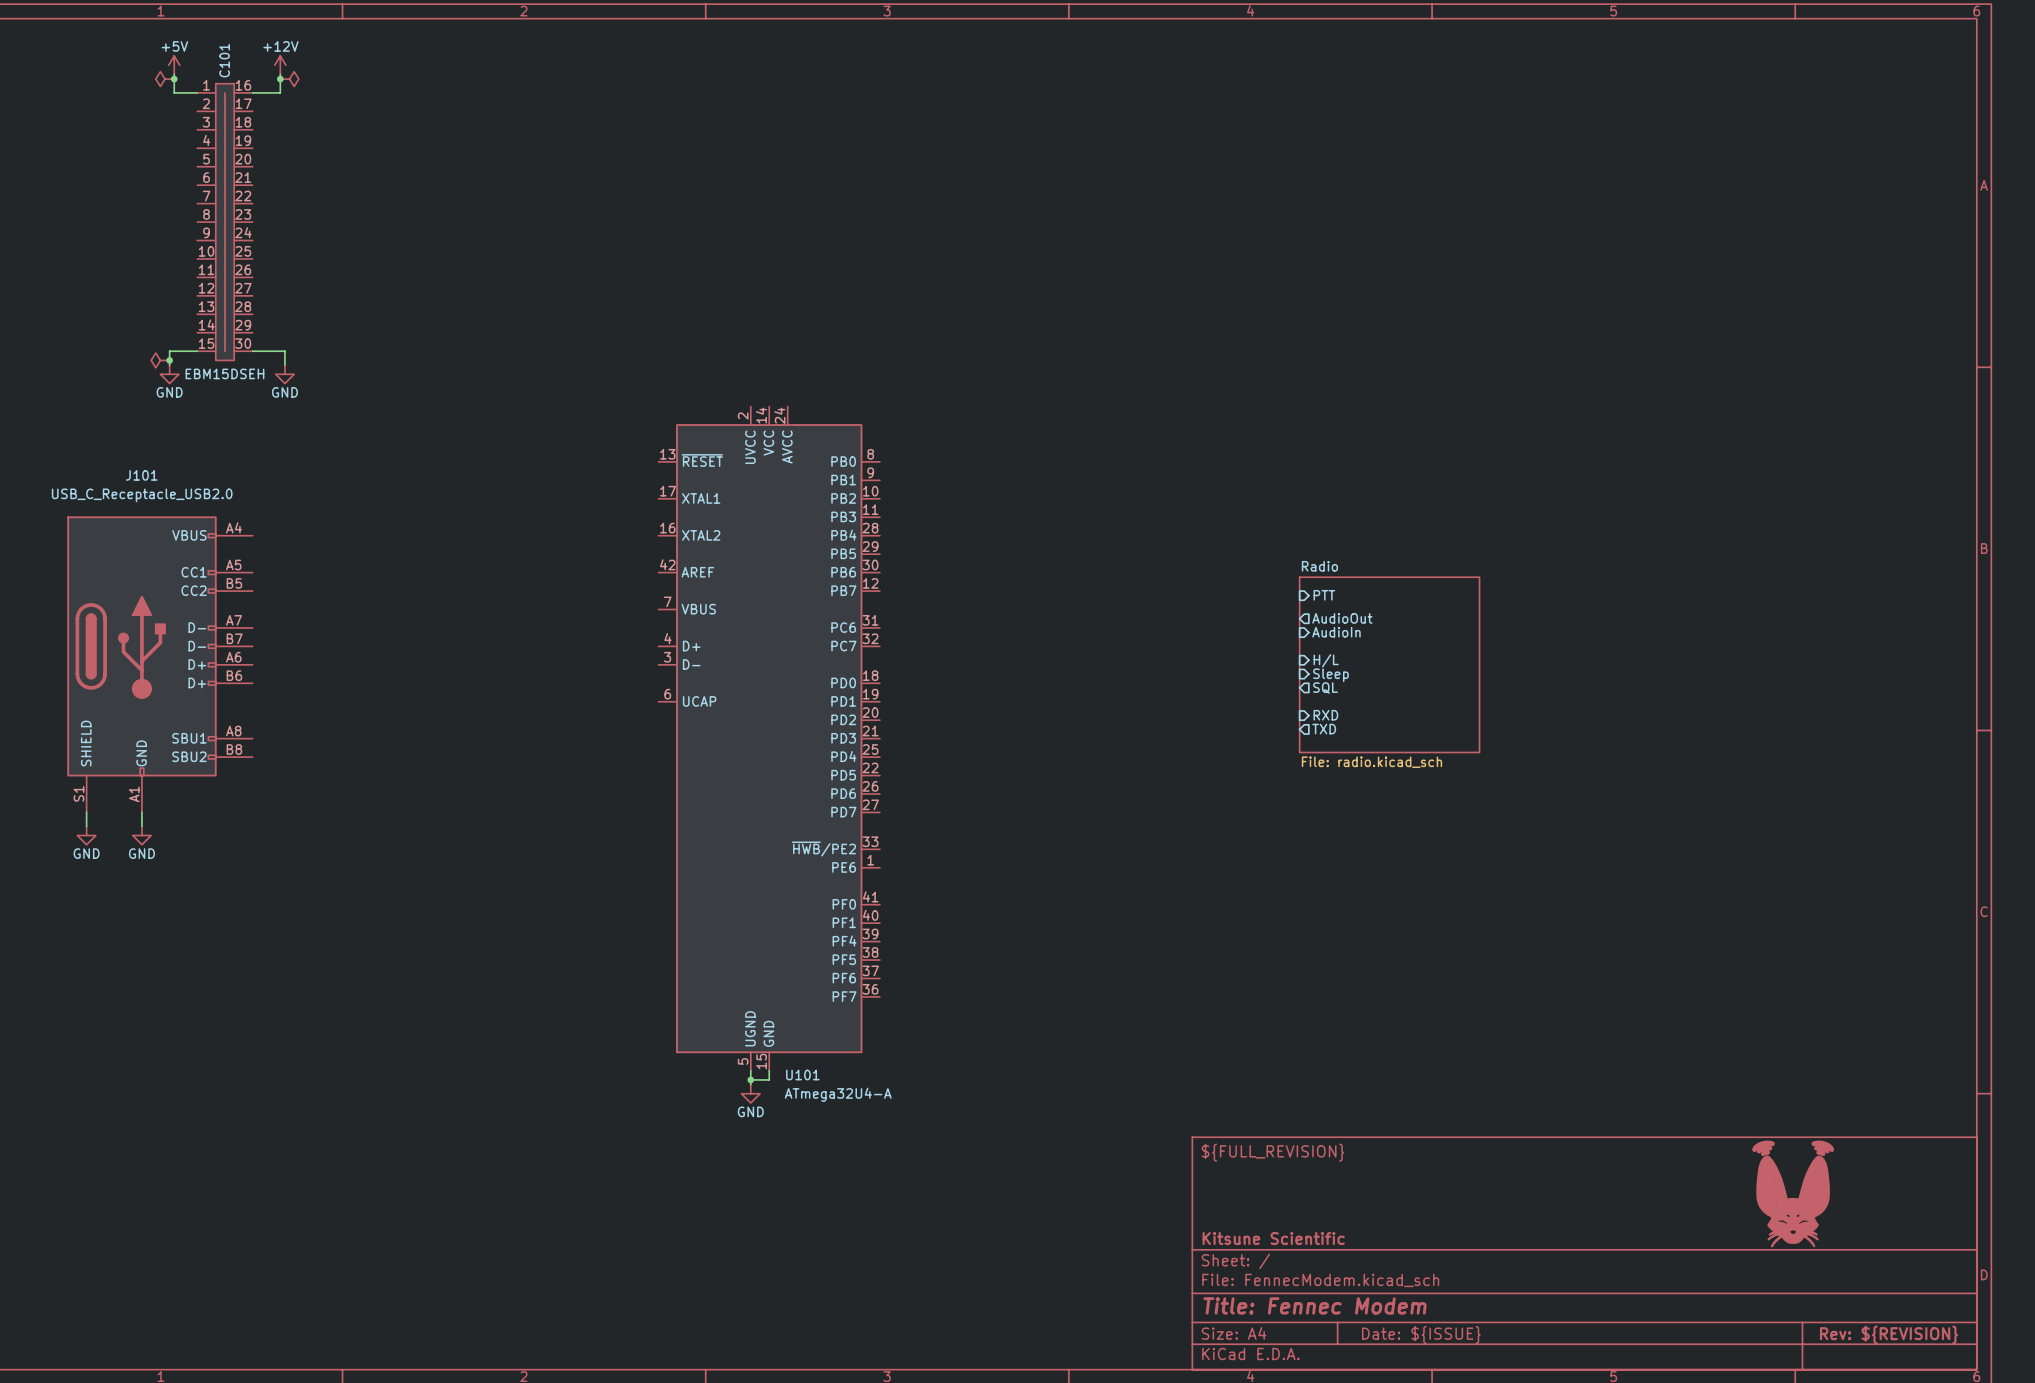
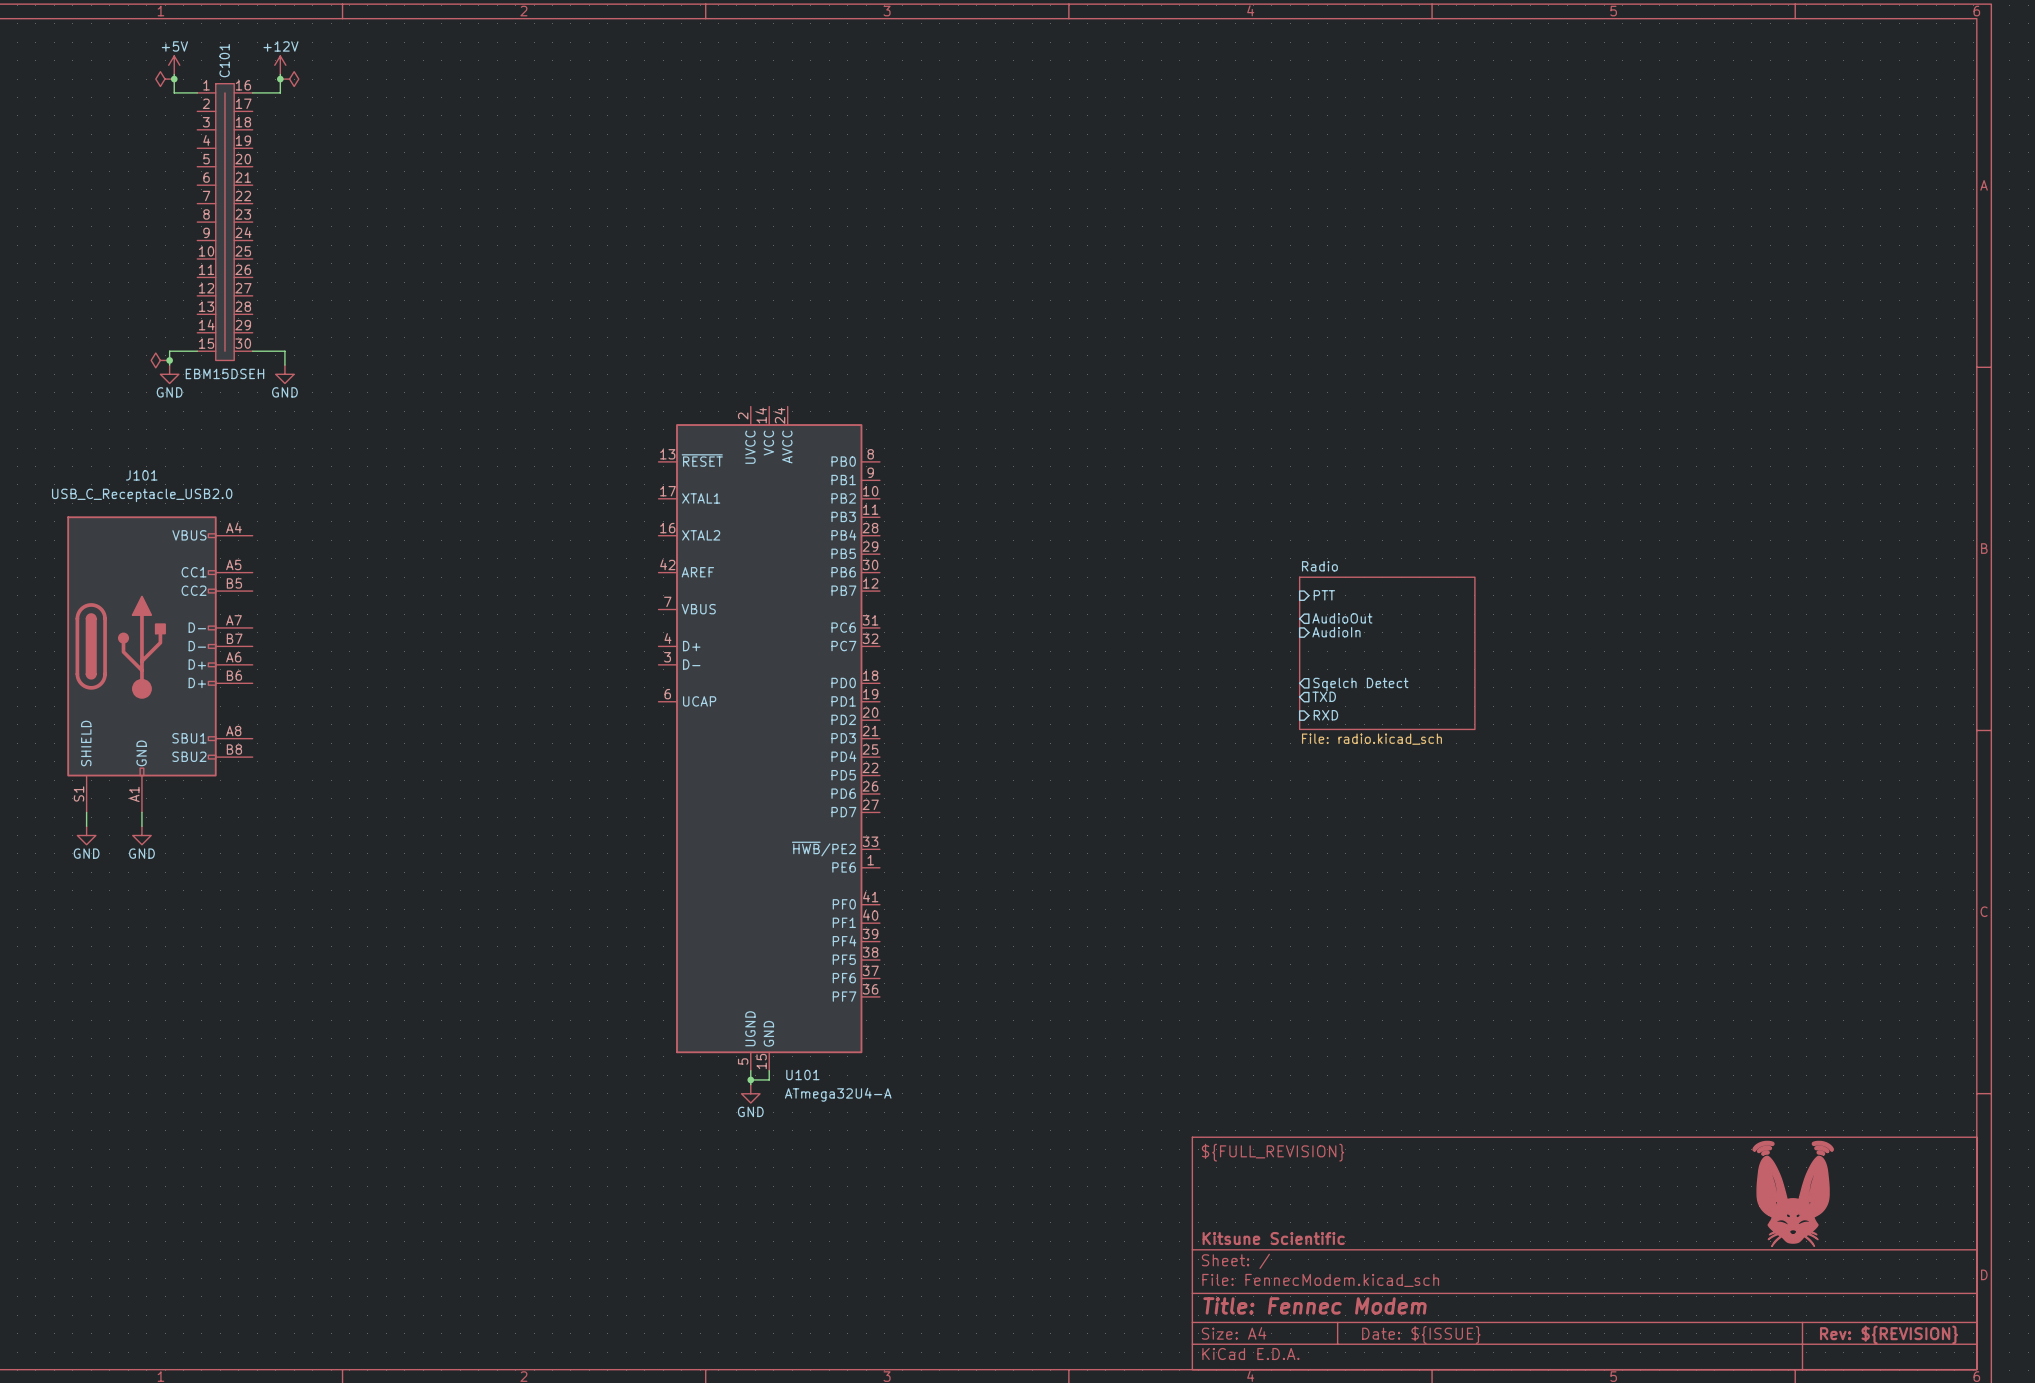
sheet Radio: none -> File: radio.kicad_sch (1387, 653)
sheet pin: H/L (1326, 660) -> none
sheet Radio: File: radio.kicad_sch (1389, 664) -> none
sheet pin: Sleep (1330, 675) -> none
sheet pin: none -> Sqelch Detect (1360, 684)
sheet pin: SQL (1325, 688) -> none
sheet pin position: TXD (1324, 729) -> TXD (1324, 696)

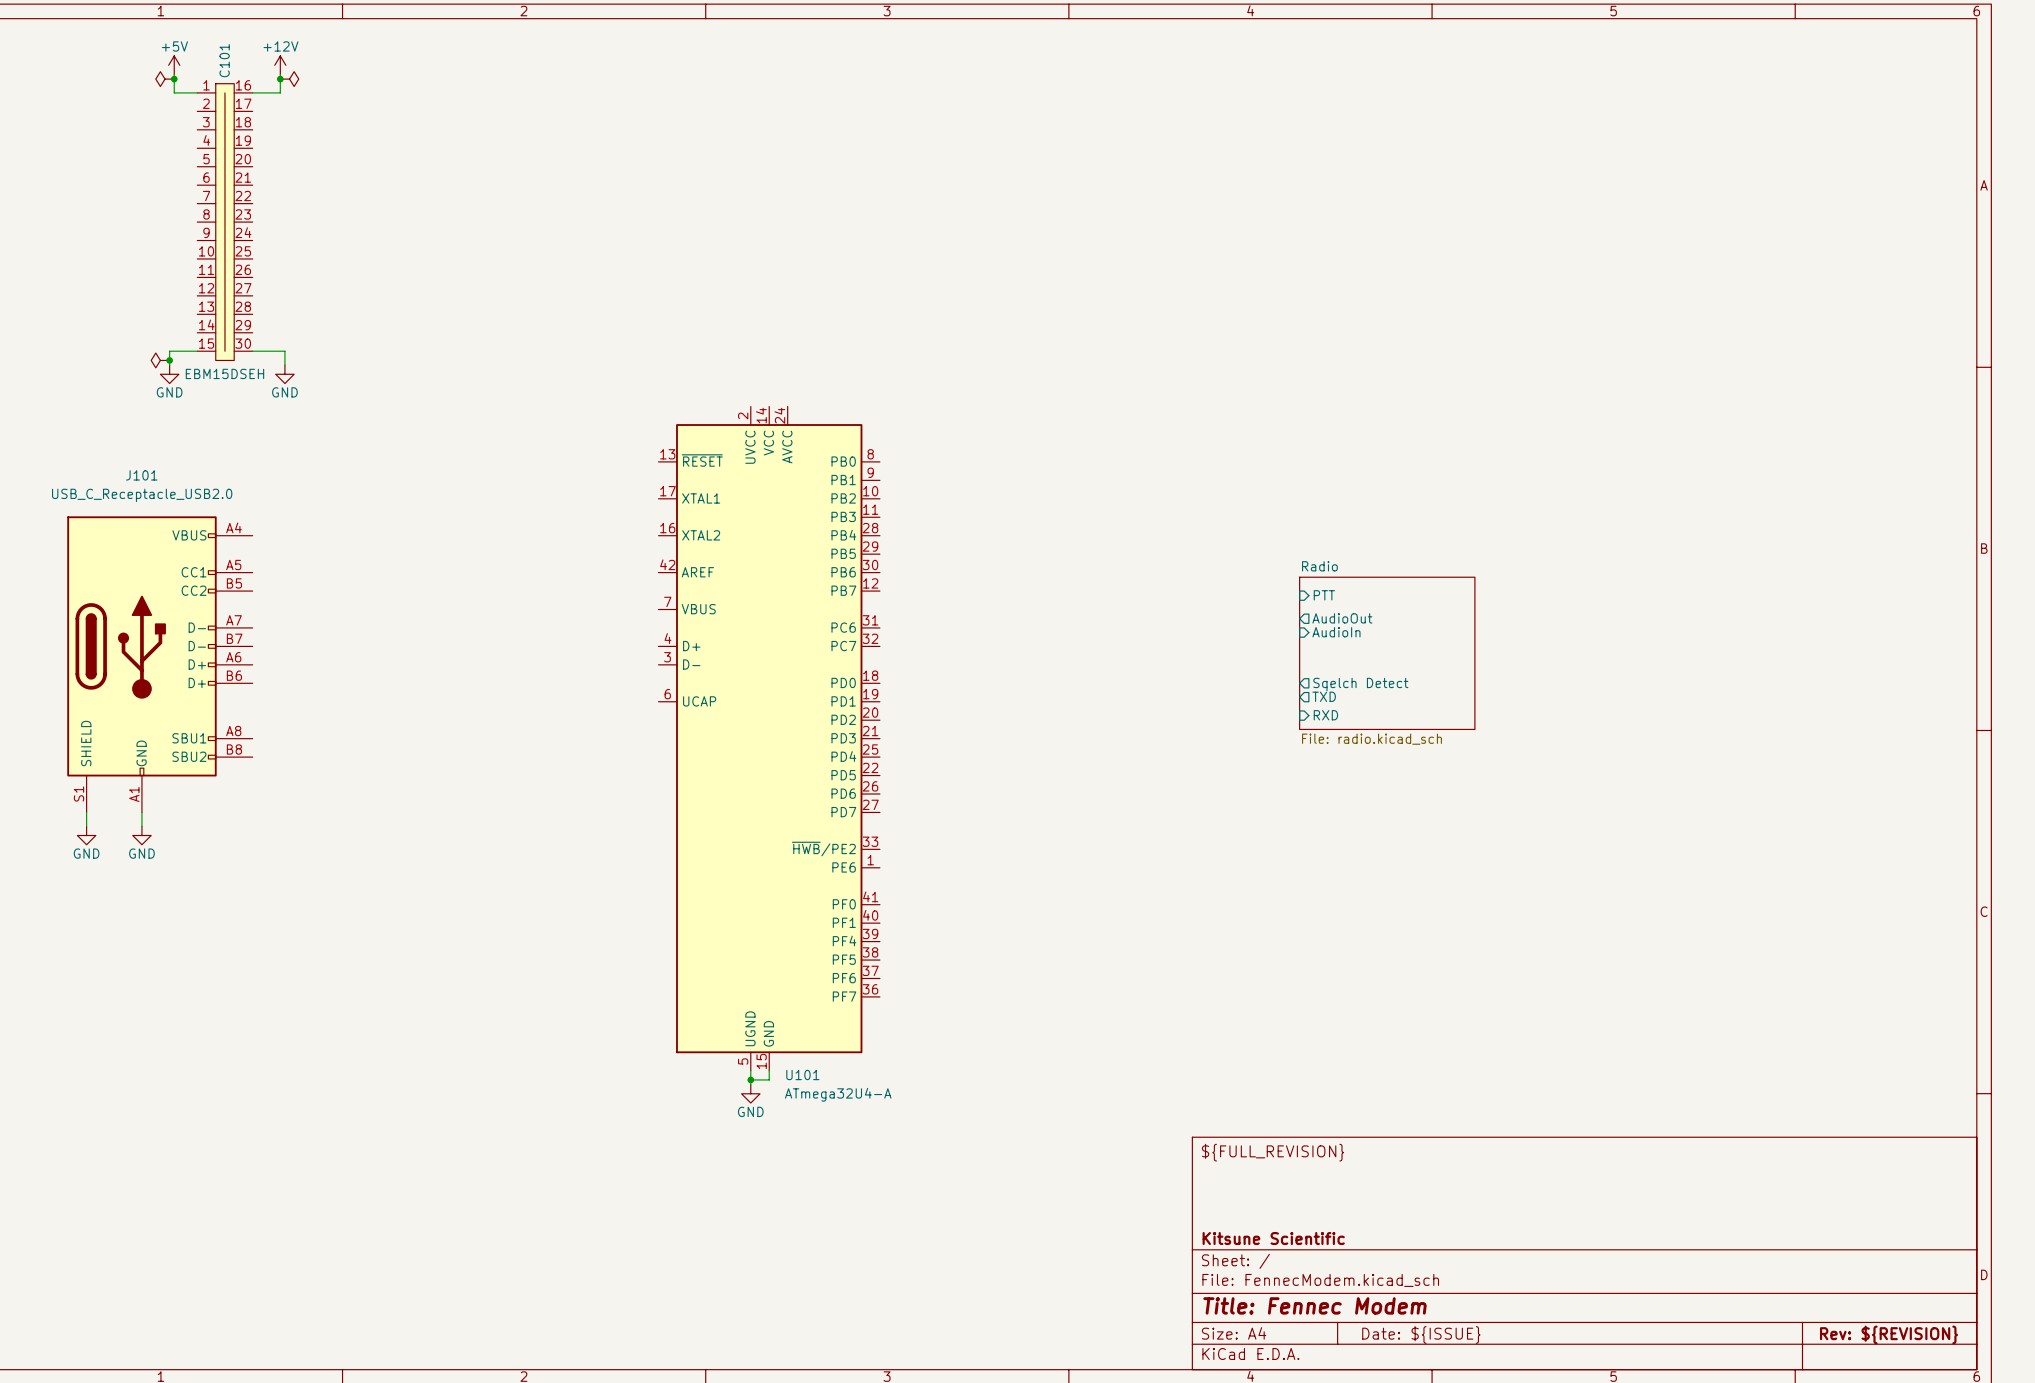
power symbol: (1793, 1193) -> none

